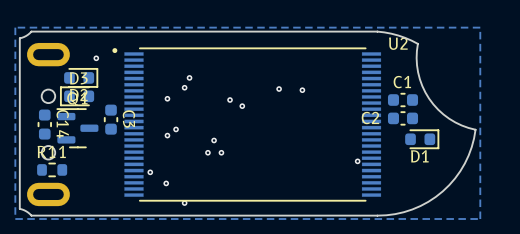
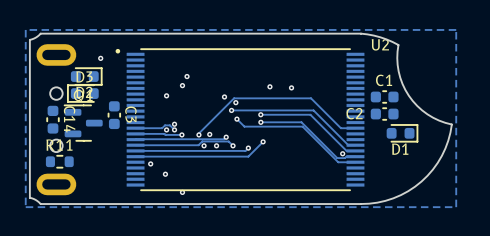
track: none -> (231, 110) (313, 110) (348, 145) (355, 145)
via: none -> (231, 110)
track: none -> (260, 114) (310, 114) (346, 150) (355, 150)
via: none -> (260, 114)
track: none -> (236, 119) (244, 126) (302, 126) (338, 162) (355, 162)
via: none -> (236, 119)
track: none -> (260, 122) (301, 122) (337, 158) (355, 156)
via: none -> (260, 122)
track: none -> (135, 128) (162, 128) (165, 125) (169, 125) (174, 129)
track: none -> (355, 128) (340, 128) (311, 98) (234, 98) (198, 134)
via: none -> (174, 129)
track: none -> (135, 133) (181, 134)
via: none -> (181, 134)
via: none -> (198, 134)
track: none -> (226, 137) (224, 139) (135, 139)
via: none -> (226, 137)
track: none -> (263, 141) (248, 156) (135, 156)
via: none -> (263, 141)
track: none -> (135, 145) (198, 145) (202, 141) (228, 141) (233, 145)
via: none -> (233, 145)
track: none -> (248, 148) (245, 150) (135, 150)
via: none -> (248, 148)

